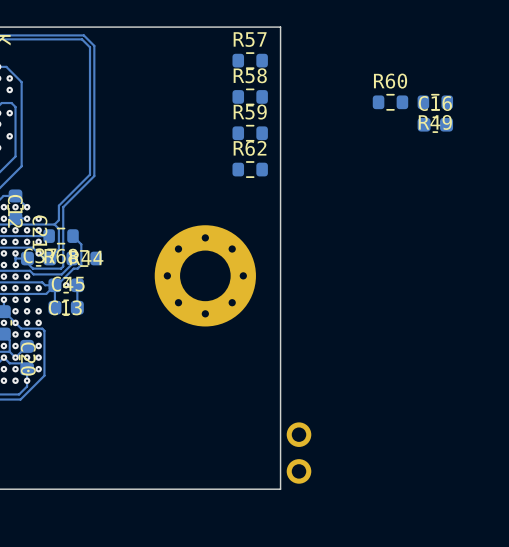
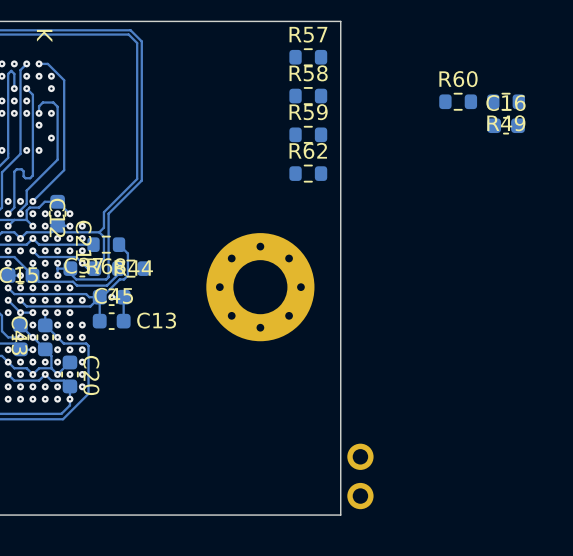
C13 name position: C13 (65, 307) -> C13 (156, 320)
C20 name position: C20 (28, 359) -> C20 (91, 375)

